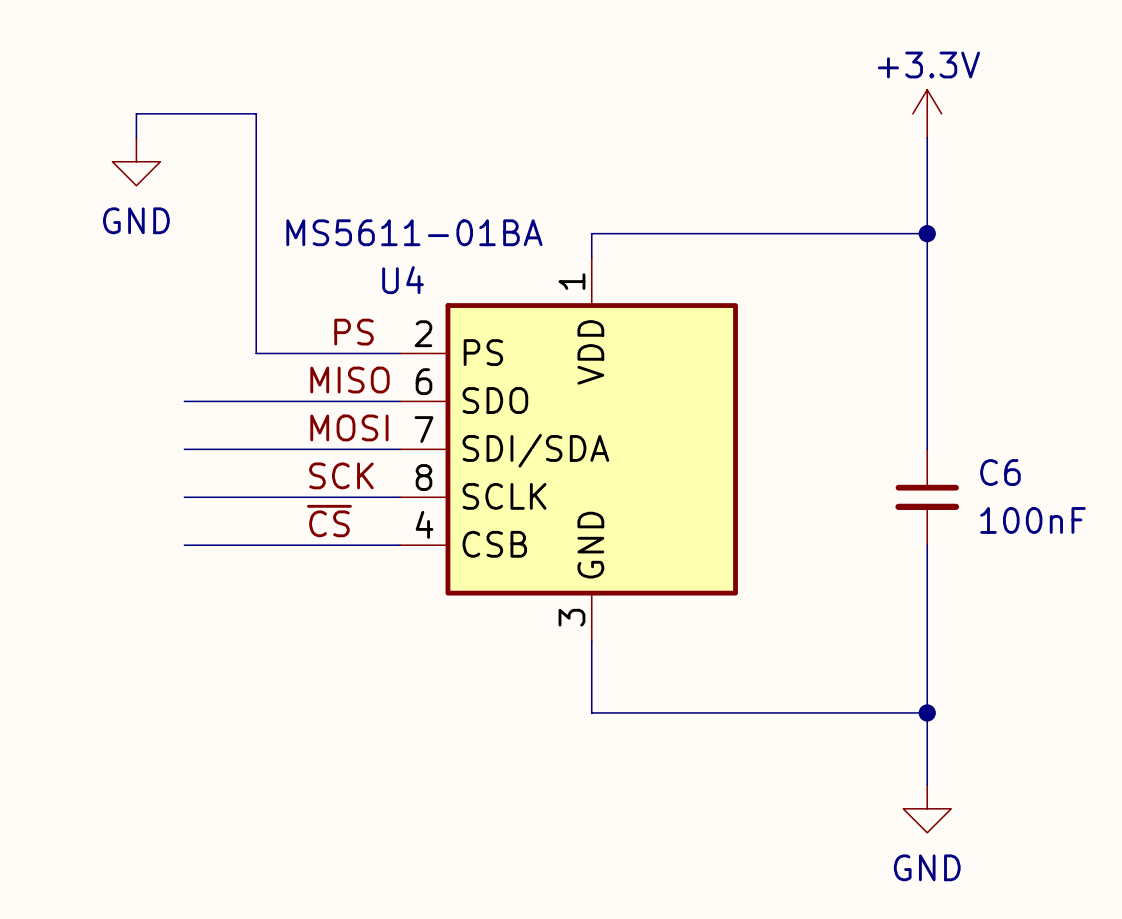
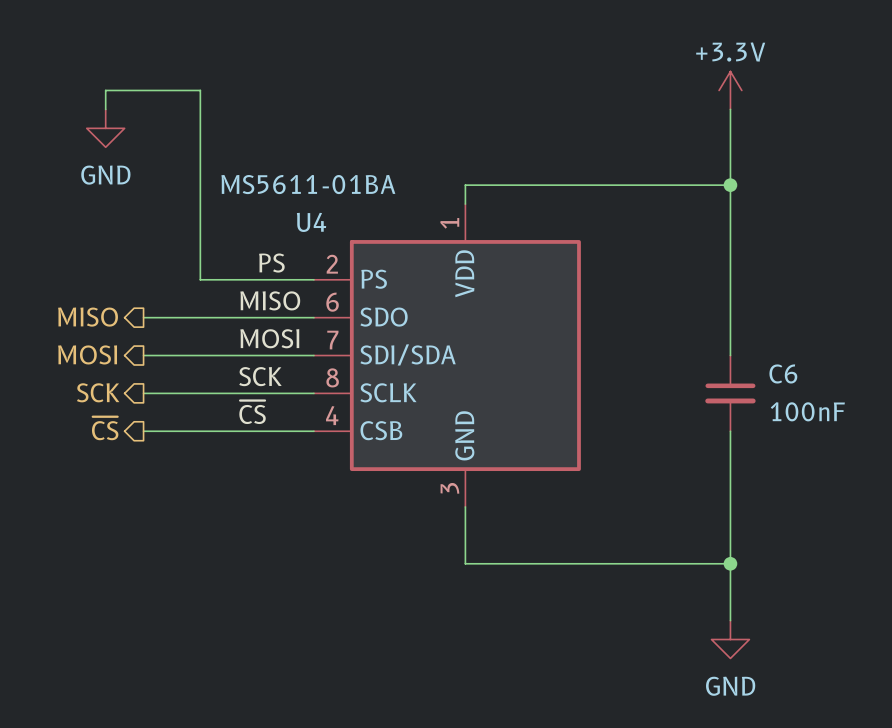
hierarchical label: none -> MISO (88, 317)
hierarchical label: none -> MOSI (87, 354)
hierarchical label: none -> SCK (98, 392)
hierarchical label: none -> ~{CS} (105, 428)

